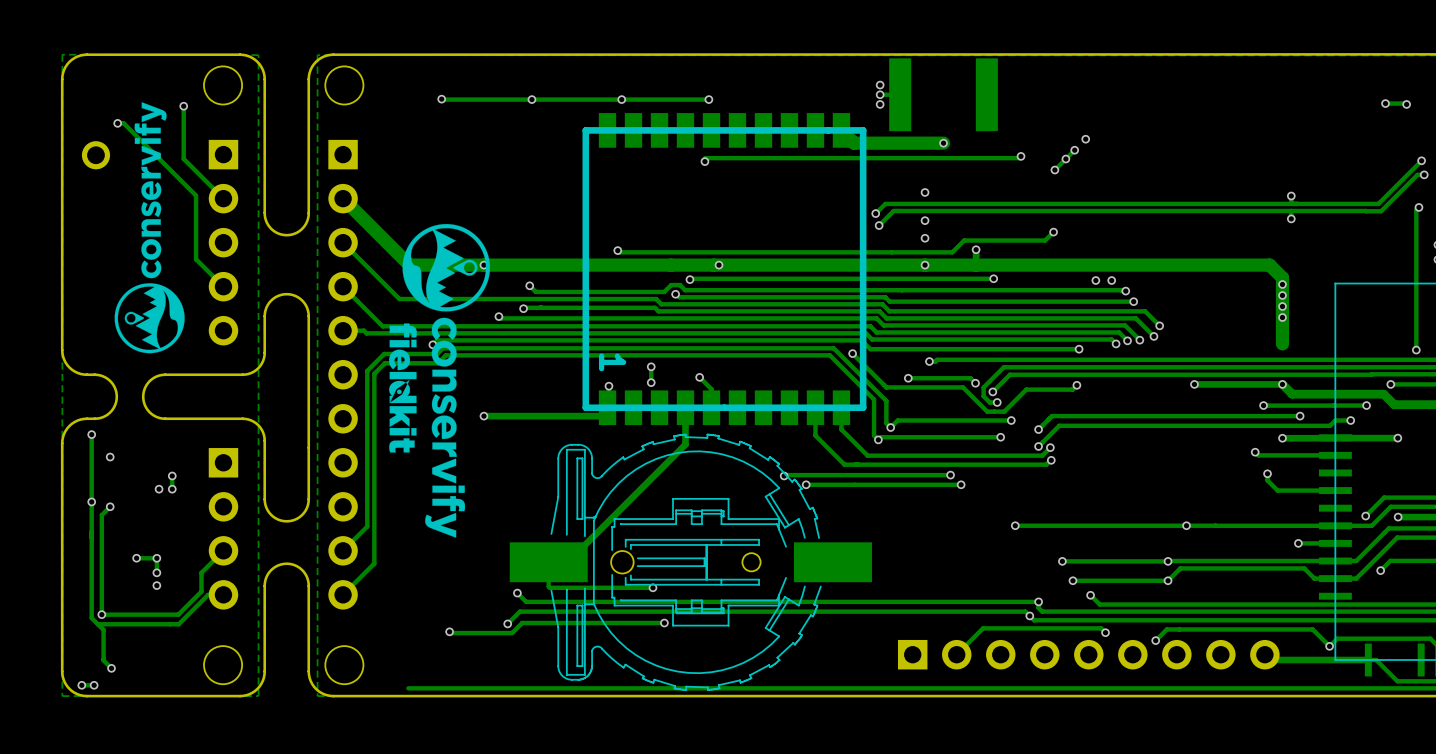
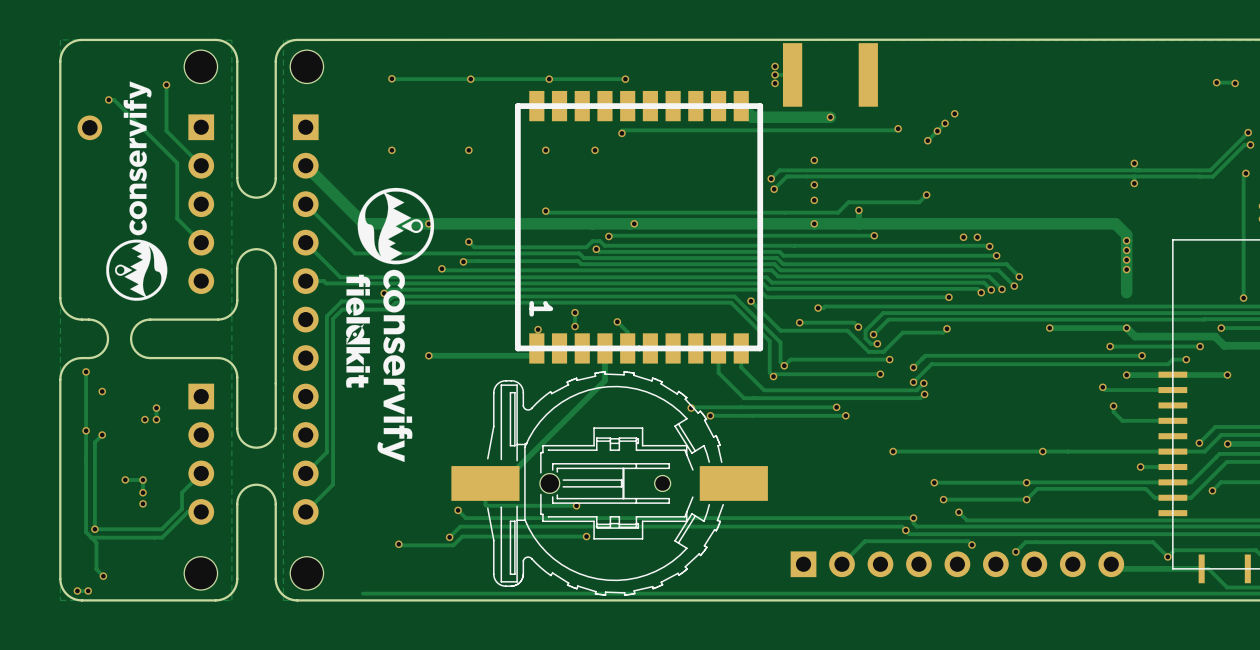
via: none -> (391, 150)
via: none -> (468, 150)
via: none -> (545, 150)
via: none -> (595, 150)

